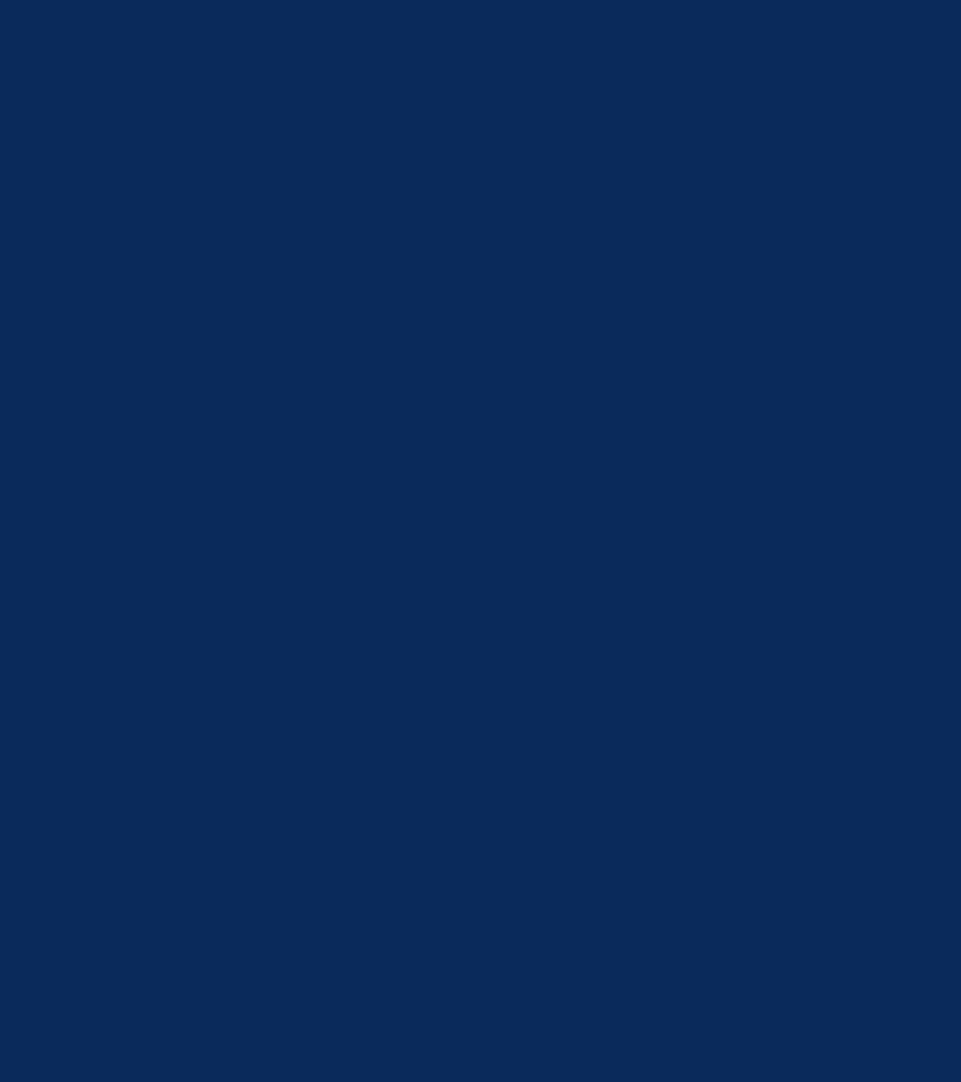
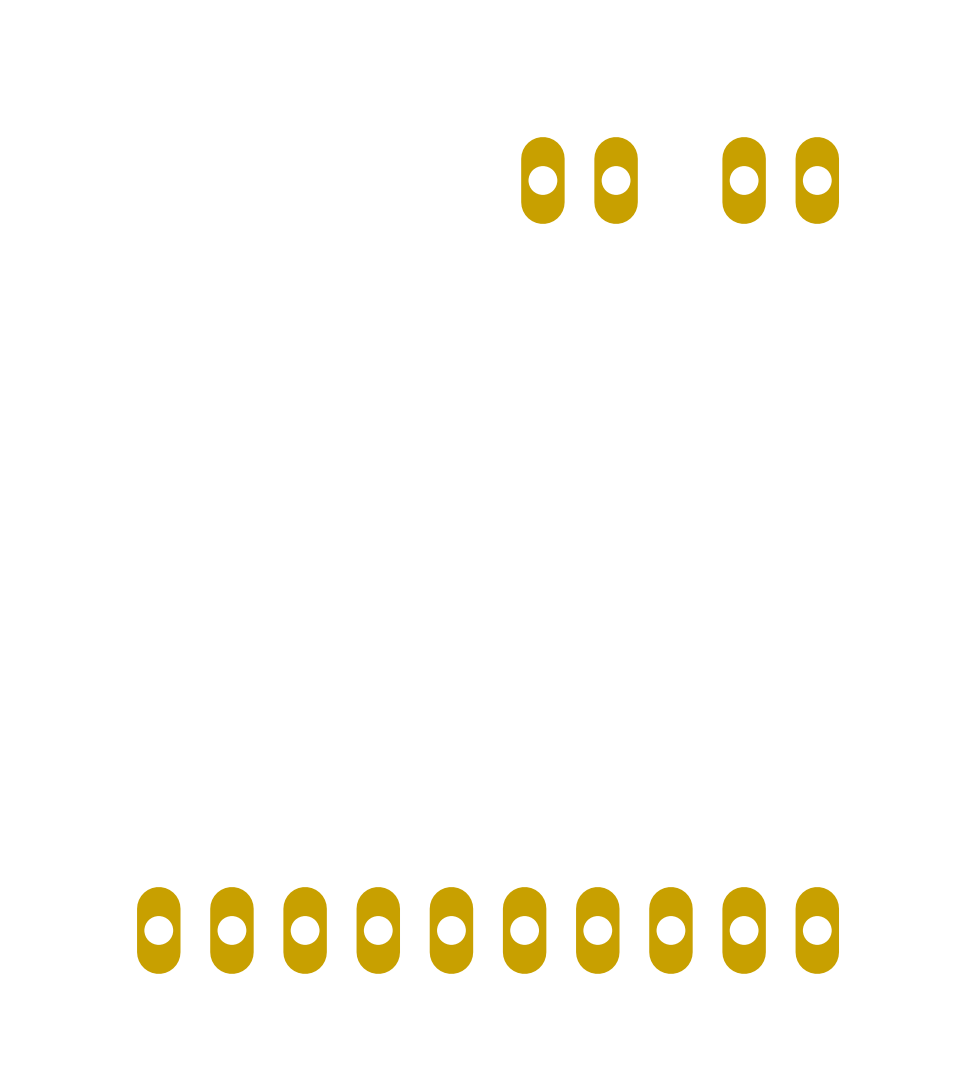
part: none -> (579, 180)
part: none -> (780, 180)
part: none -> (488, 930)

